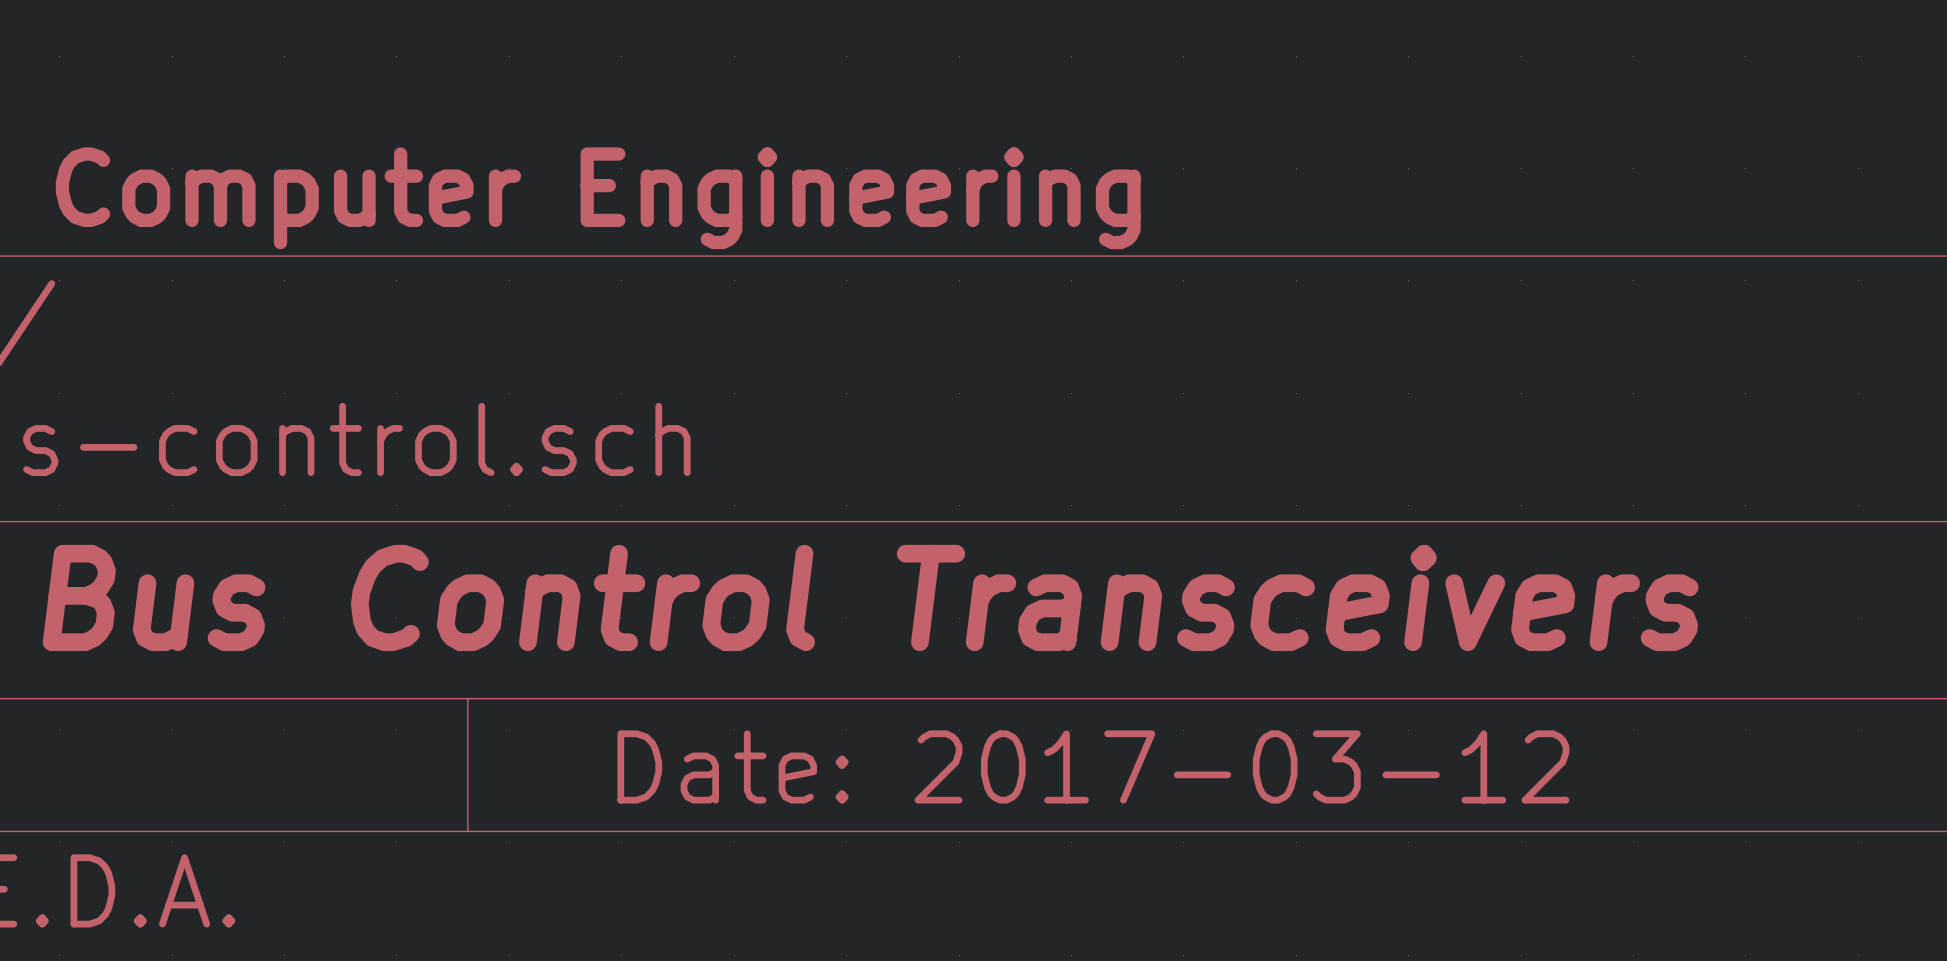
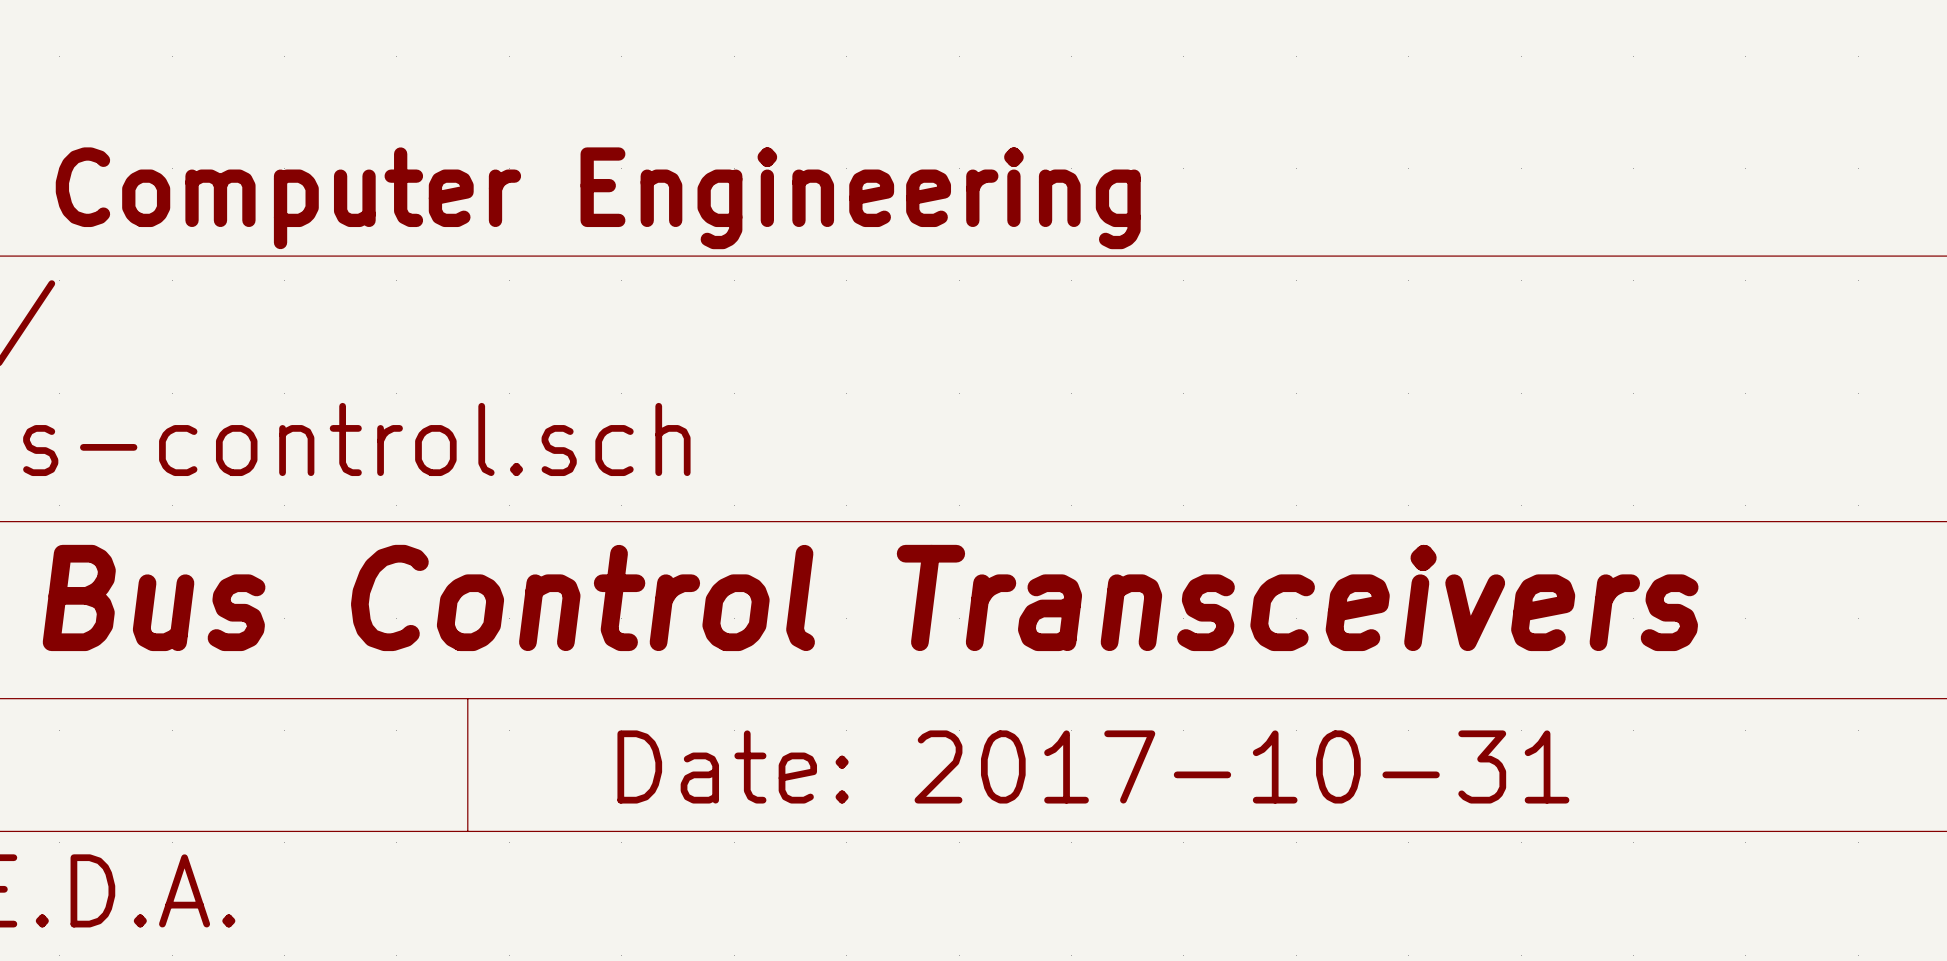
title block: Date: 2017-03-12 (1093, 766) -> Date: 2017-10-31 (1093, 766)

